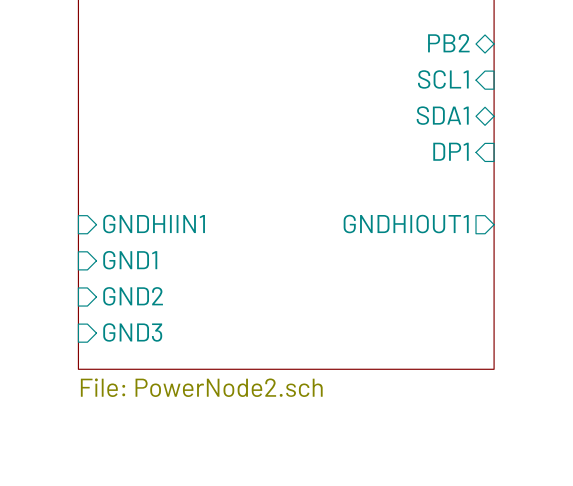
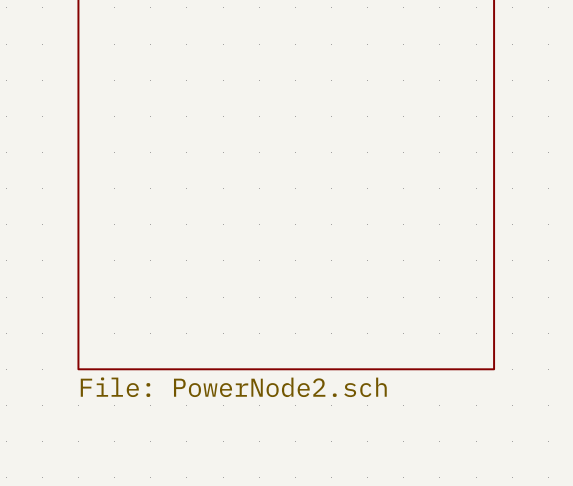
sheet pin: PB2 (448, 43) -> none
sheet pin: SCL1 (443, 79) -> none
sheet pin: SDA1 (442, 115) -> none
sheet pin: DP1 (451, 151) -> none
sheet pin: GNDHIIN1 (154, 224) -> none
sheet pin: GNDHIOUT1 (406, 224) -> none
sheet pin: GND1 (130, 260) -> none
sheet pin: GND2 (133, 296) -> none
sheet pin: GND3 (132, 332) -> none

